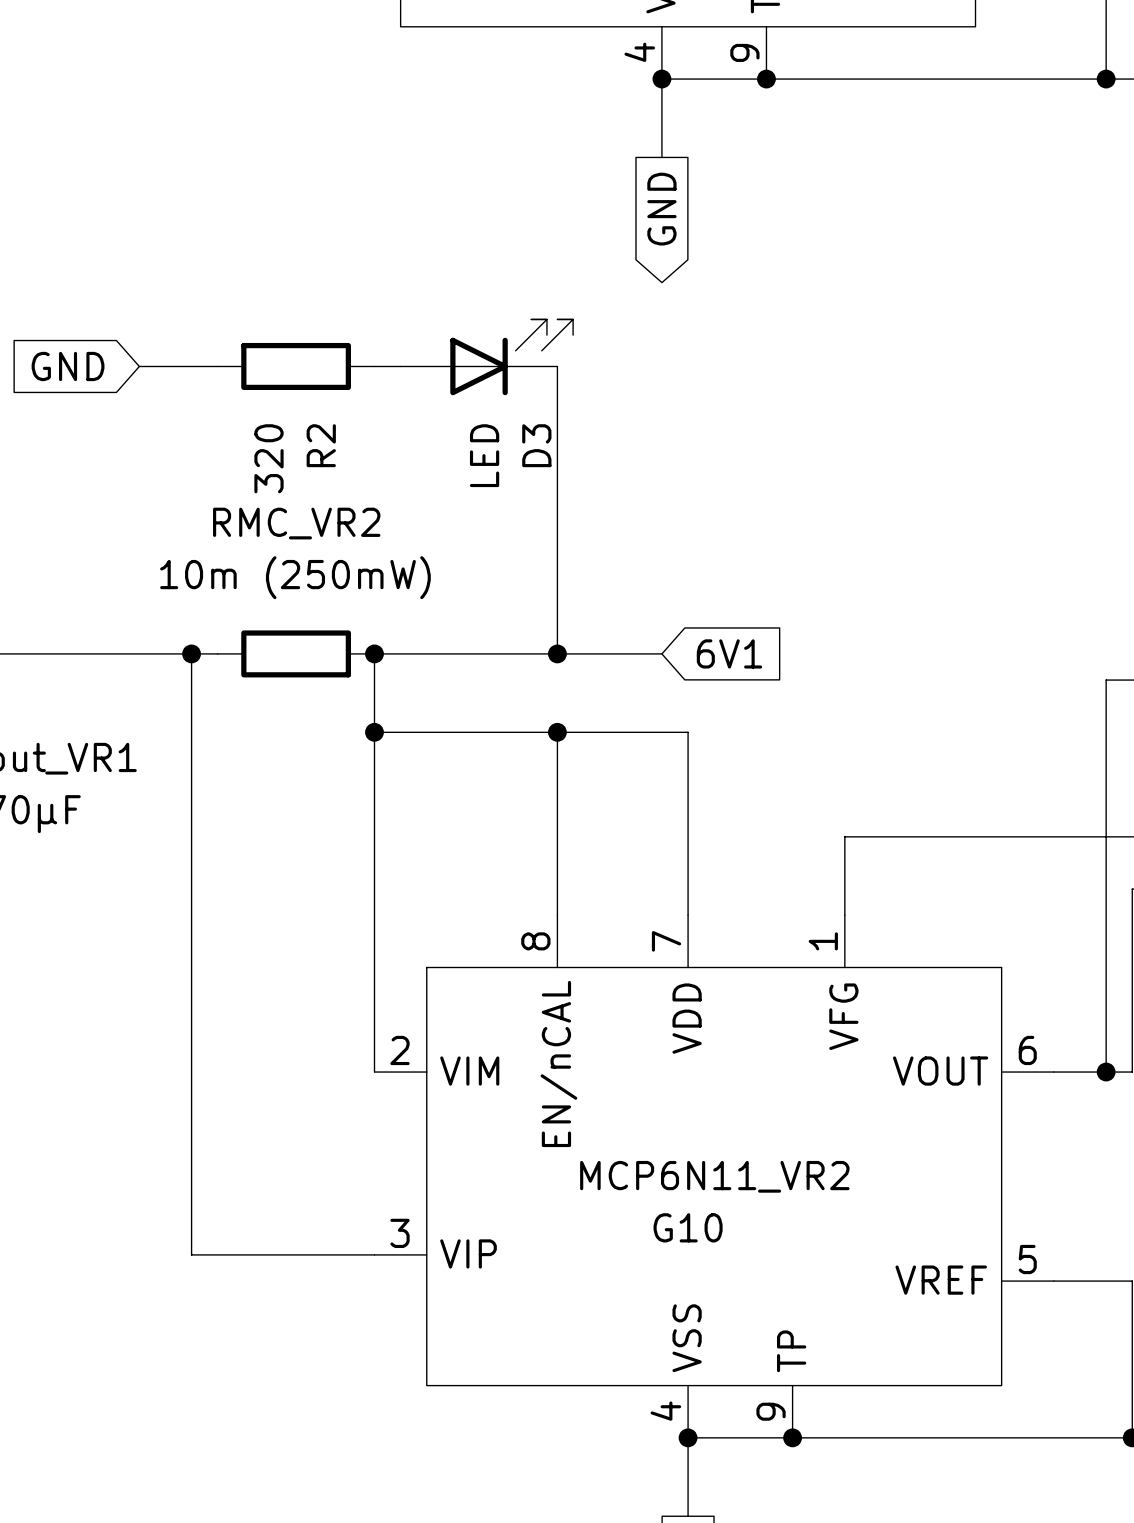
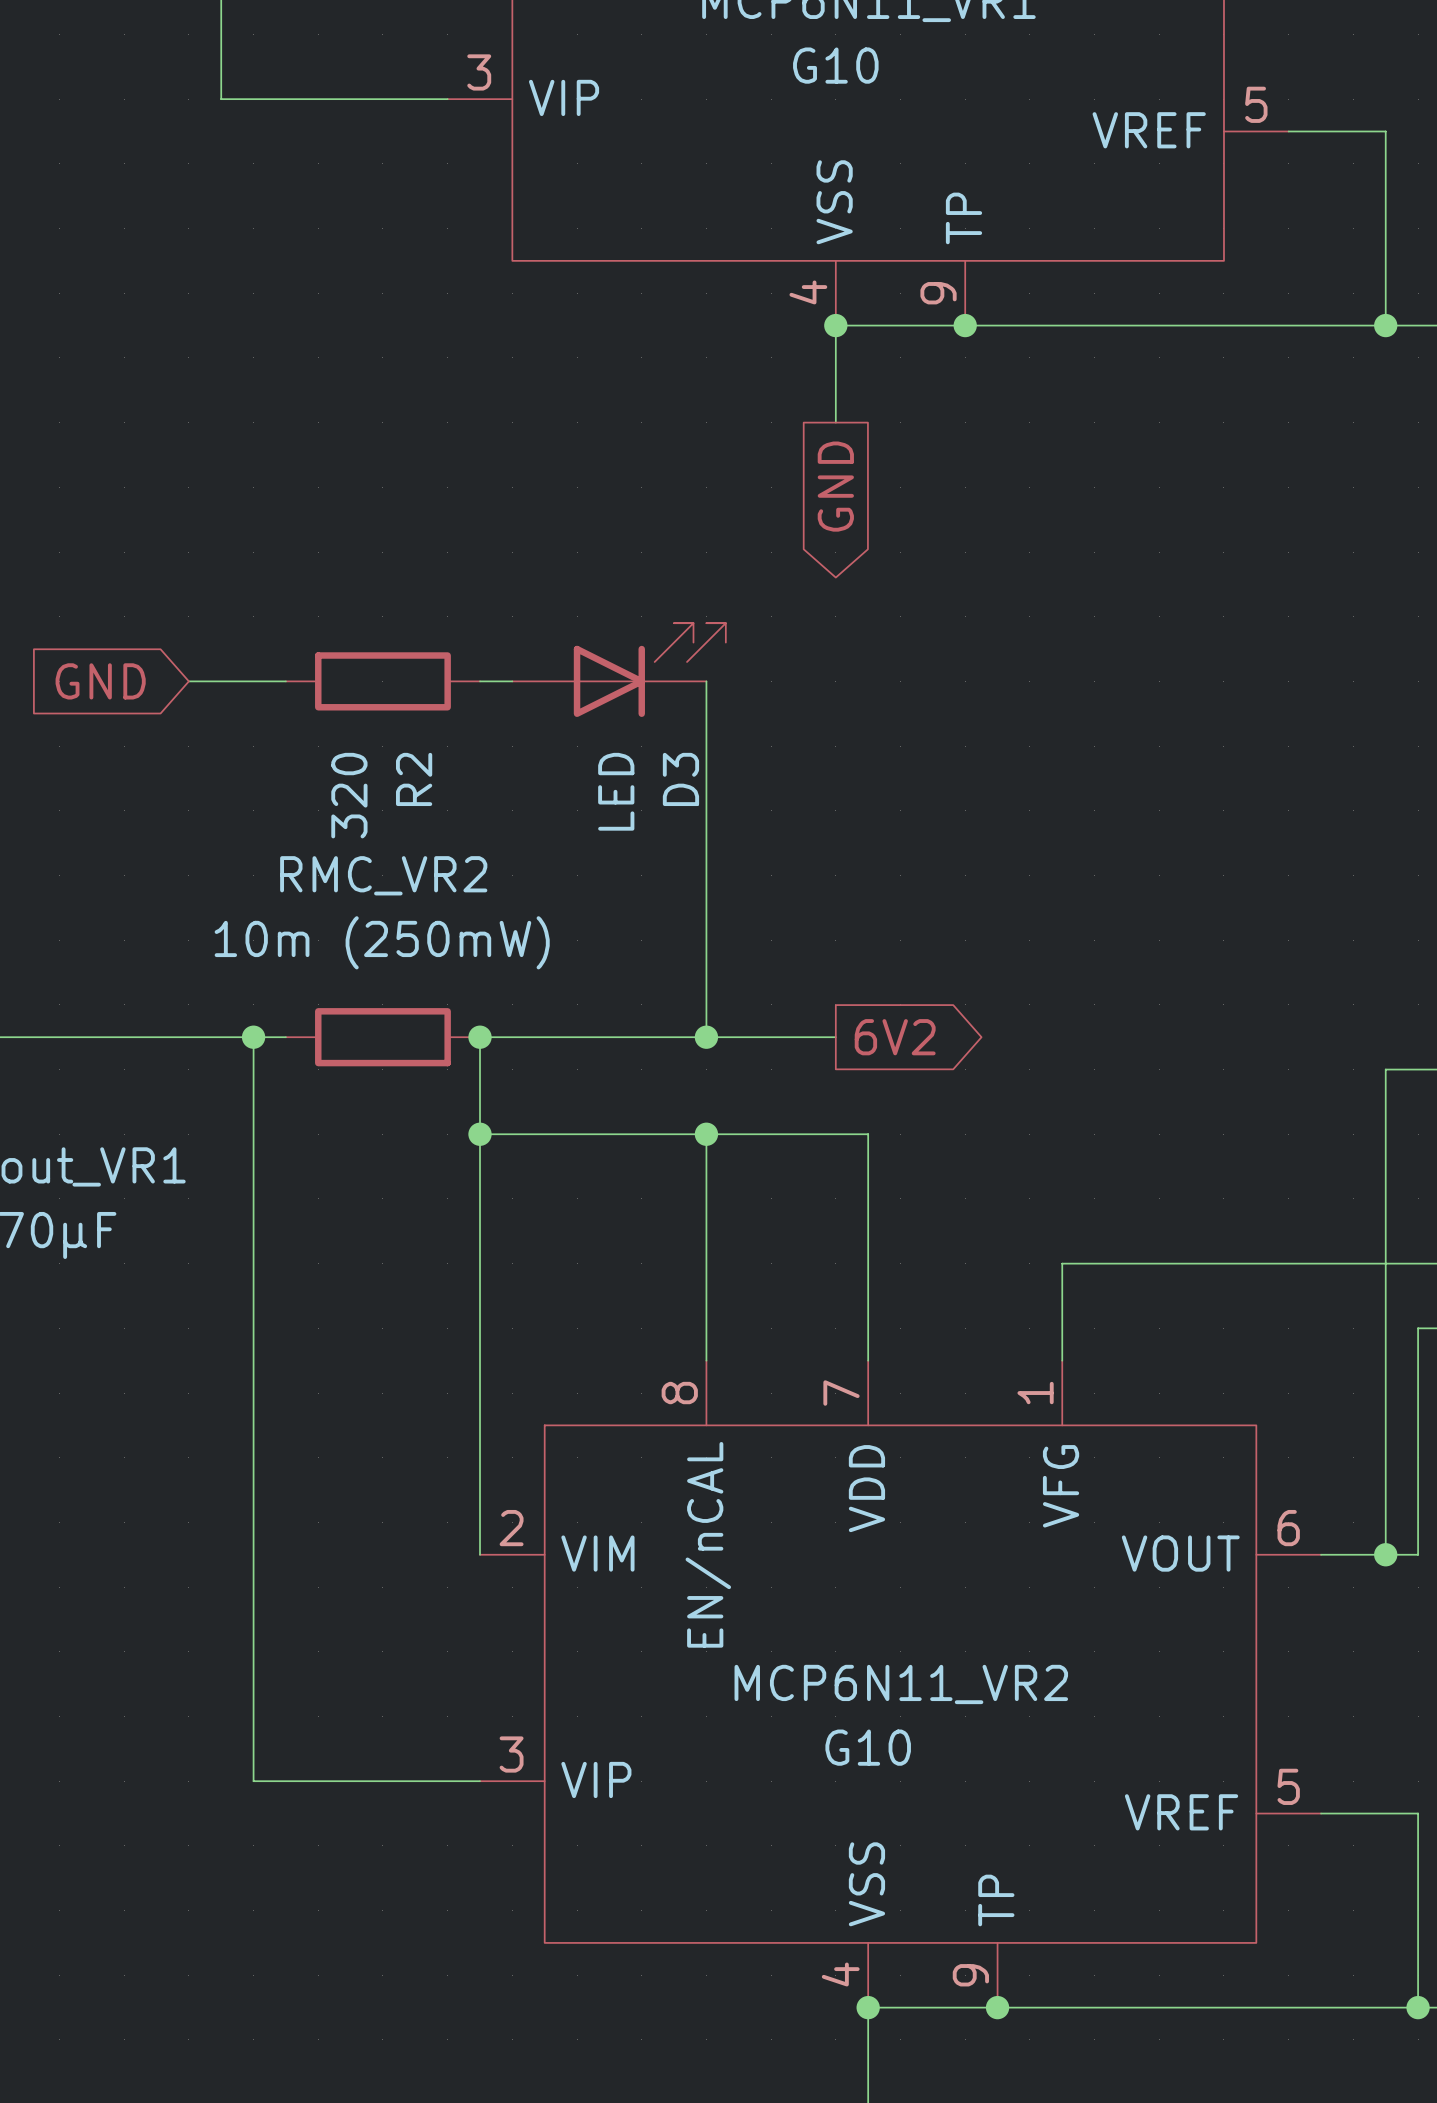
global label shape: input (729, 653) -> output (895, 1037)
global label: 6V1 (729, 653) -> 6V2 (895, 1037)

